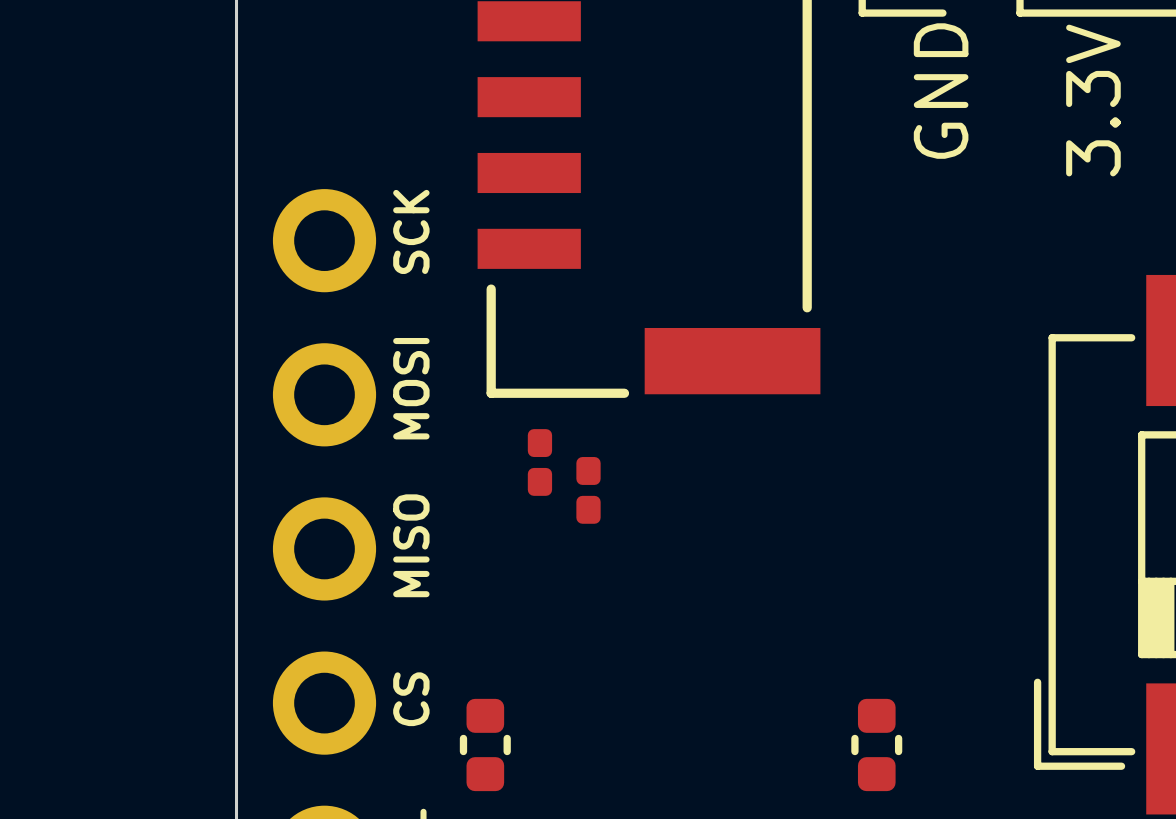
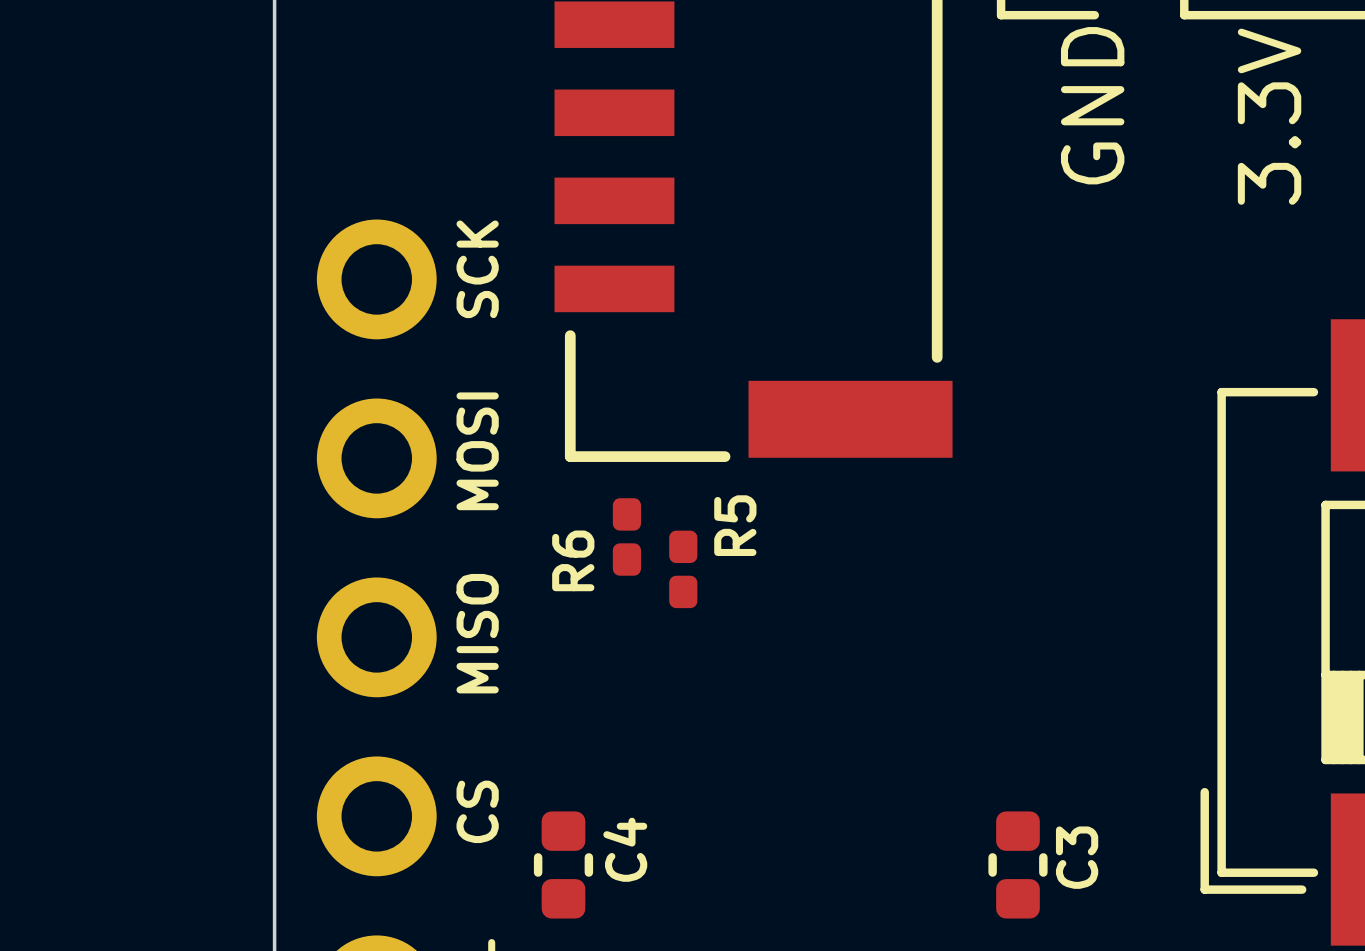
text: none -> R5 (735, 525)
text: none -> R6 (573, 560)
text: none -> C4 (625, 849)
text: none -> C3 (1077, 857)

